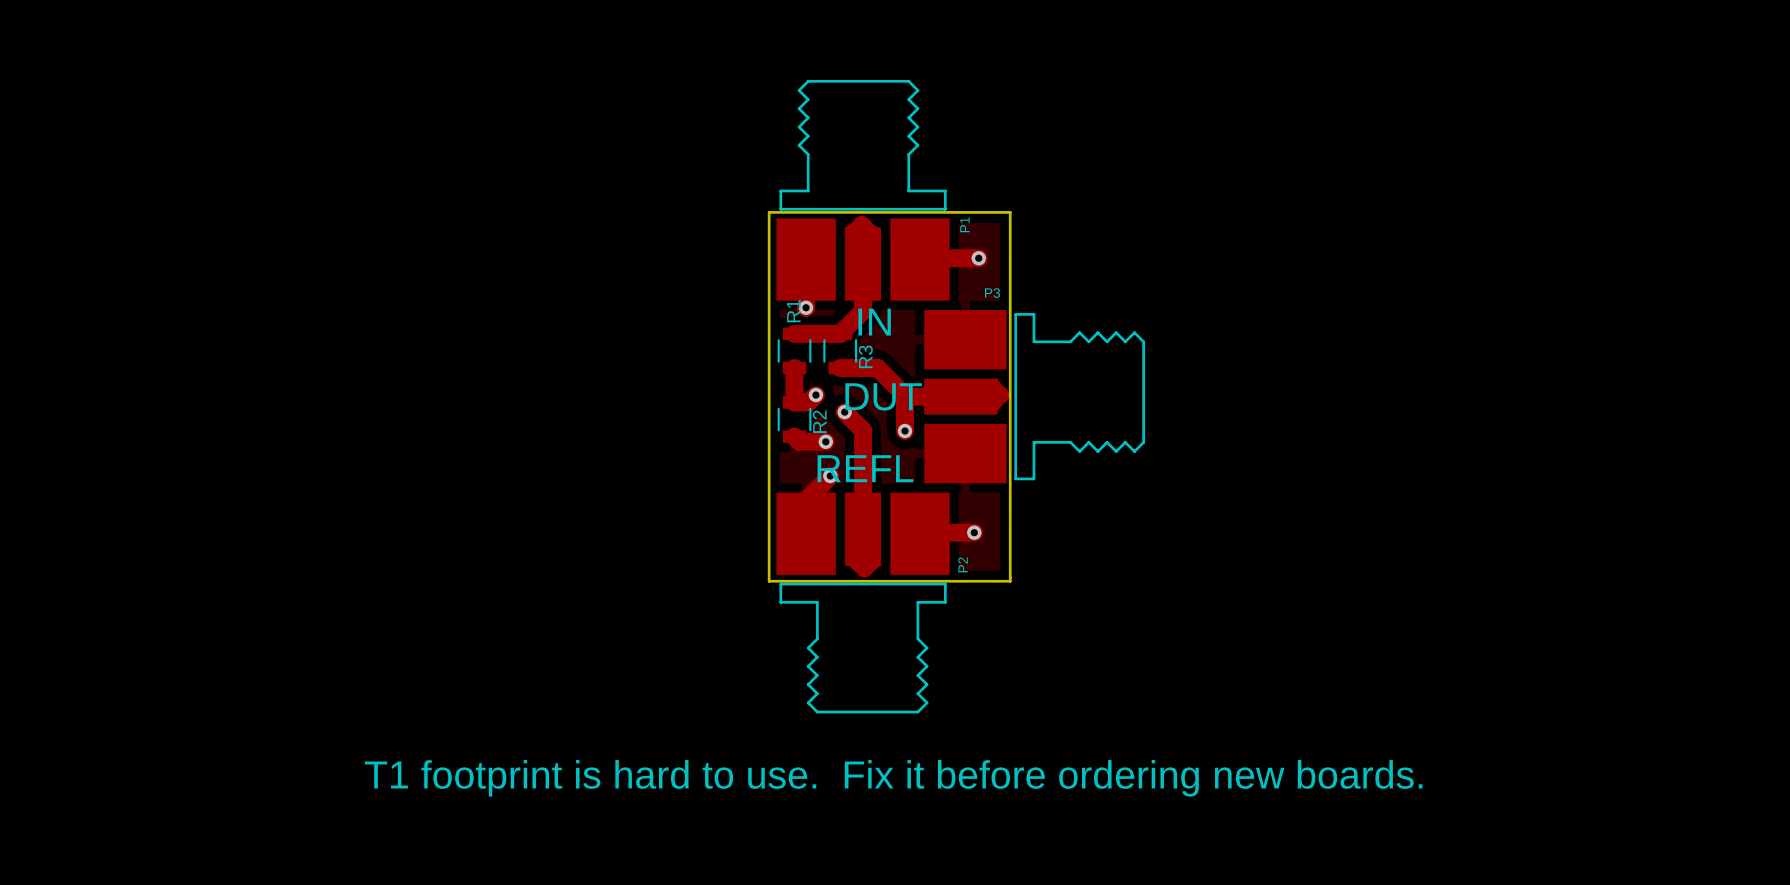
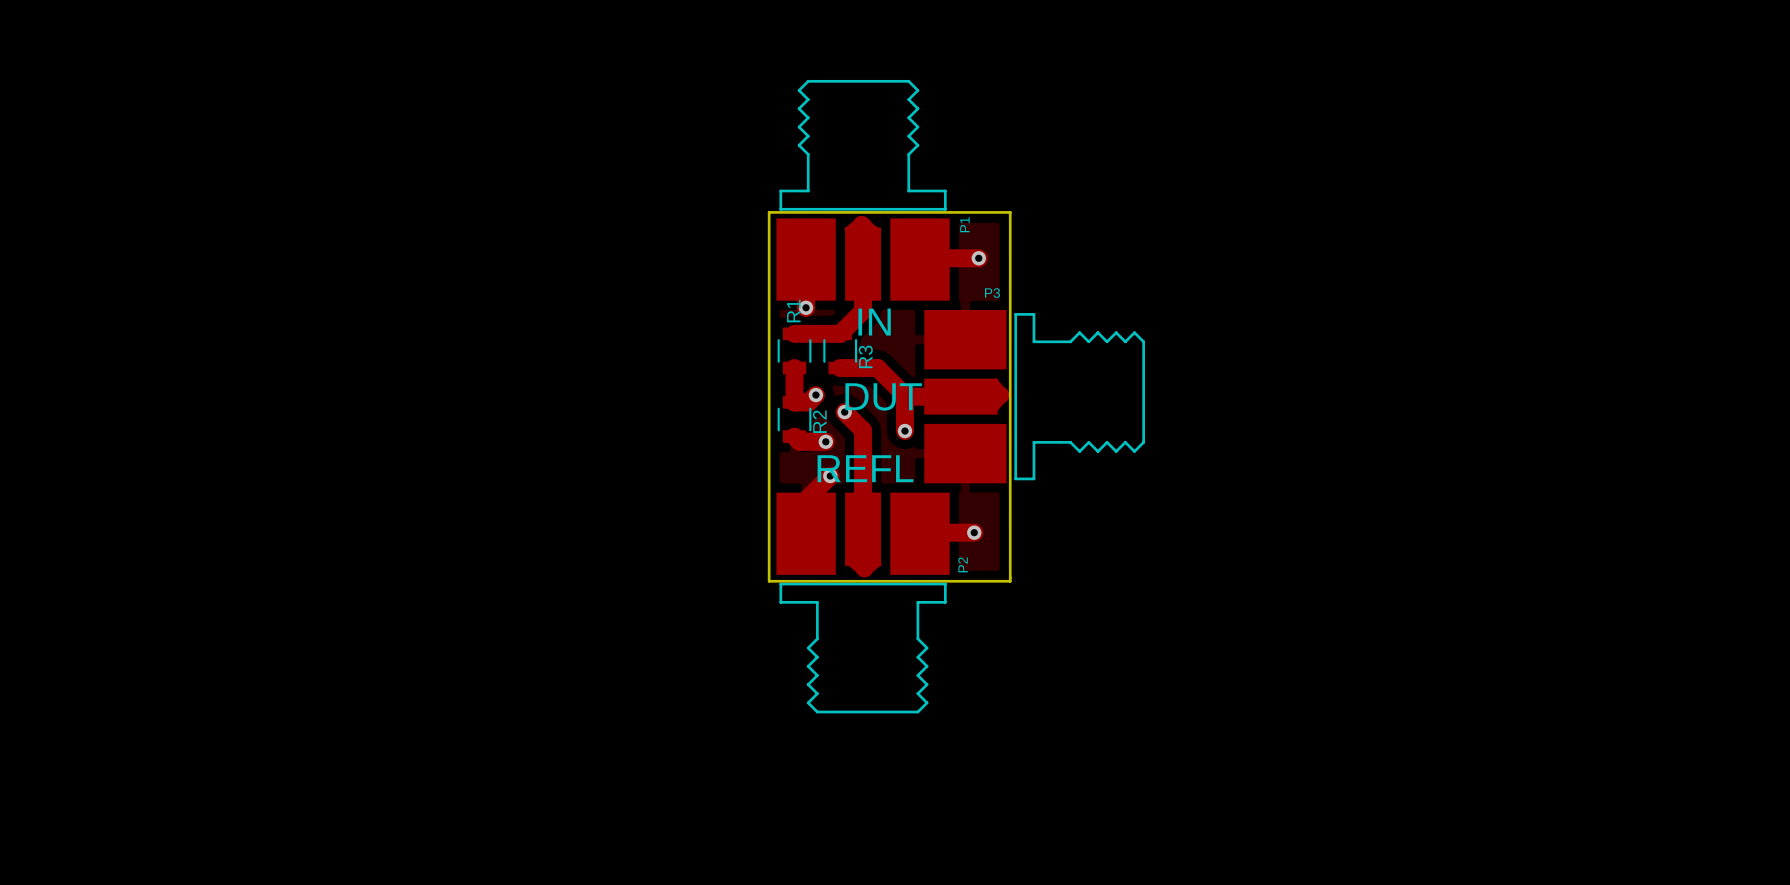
text: T1 footprint is hard to use. Fix it before ordering new boards. (893, 778) -> none

